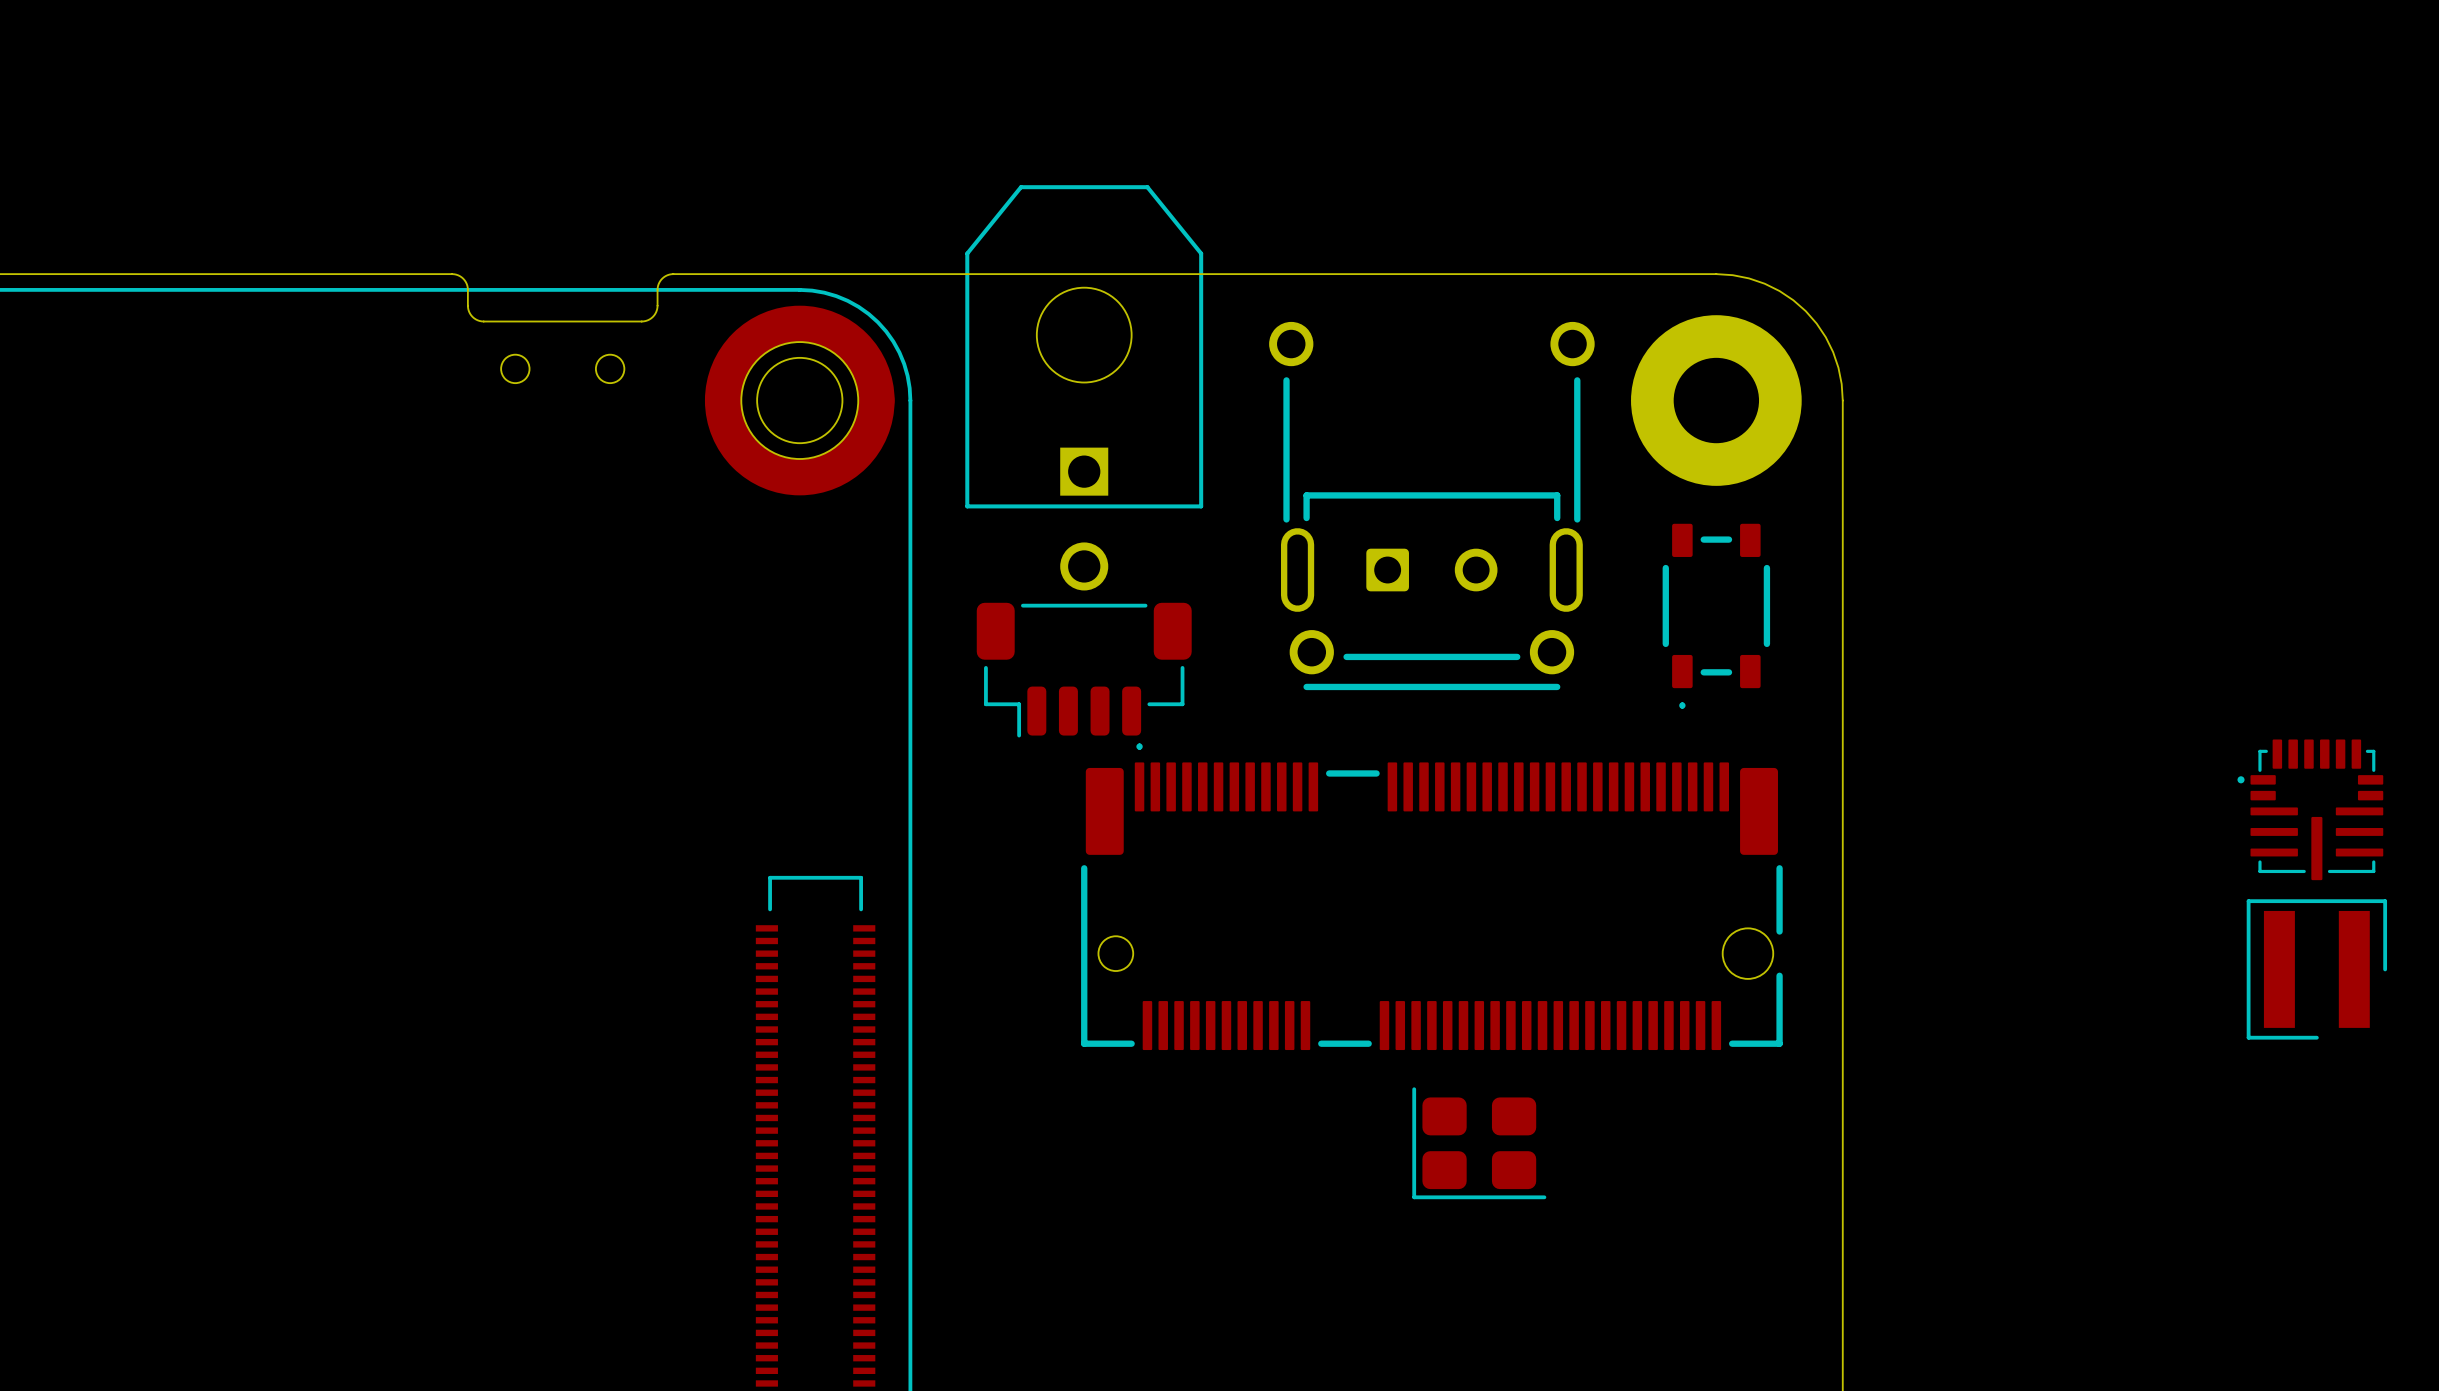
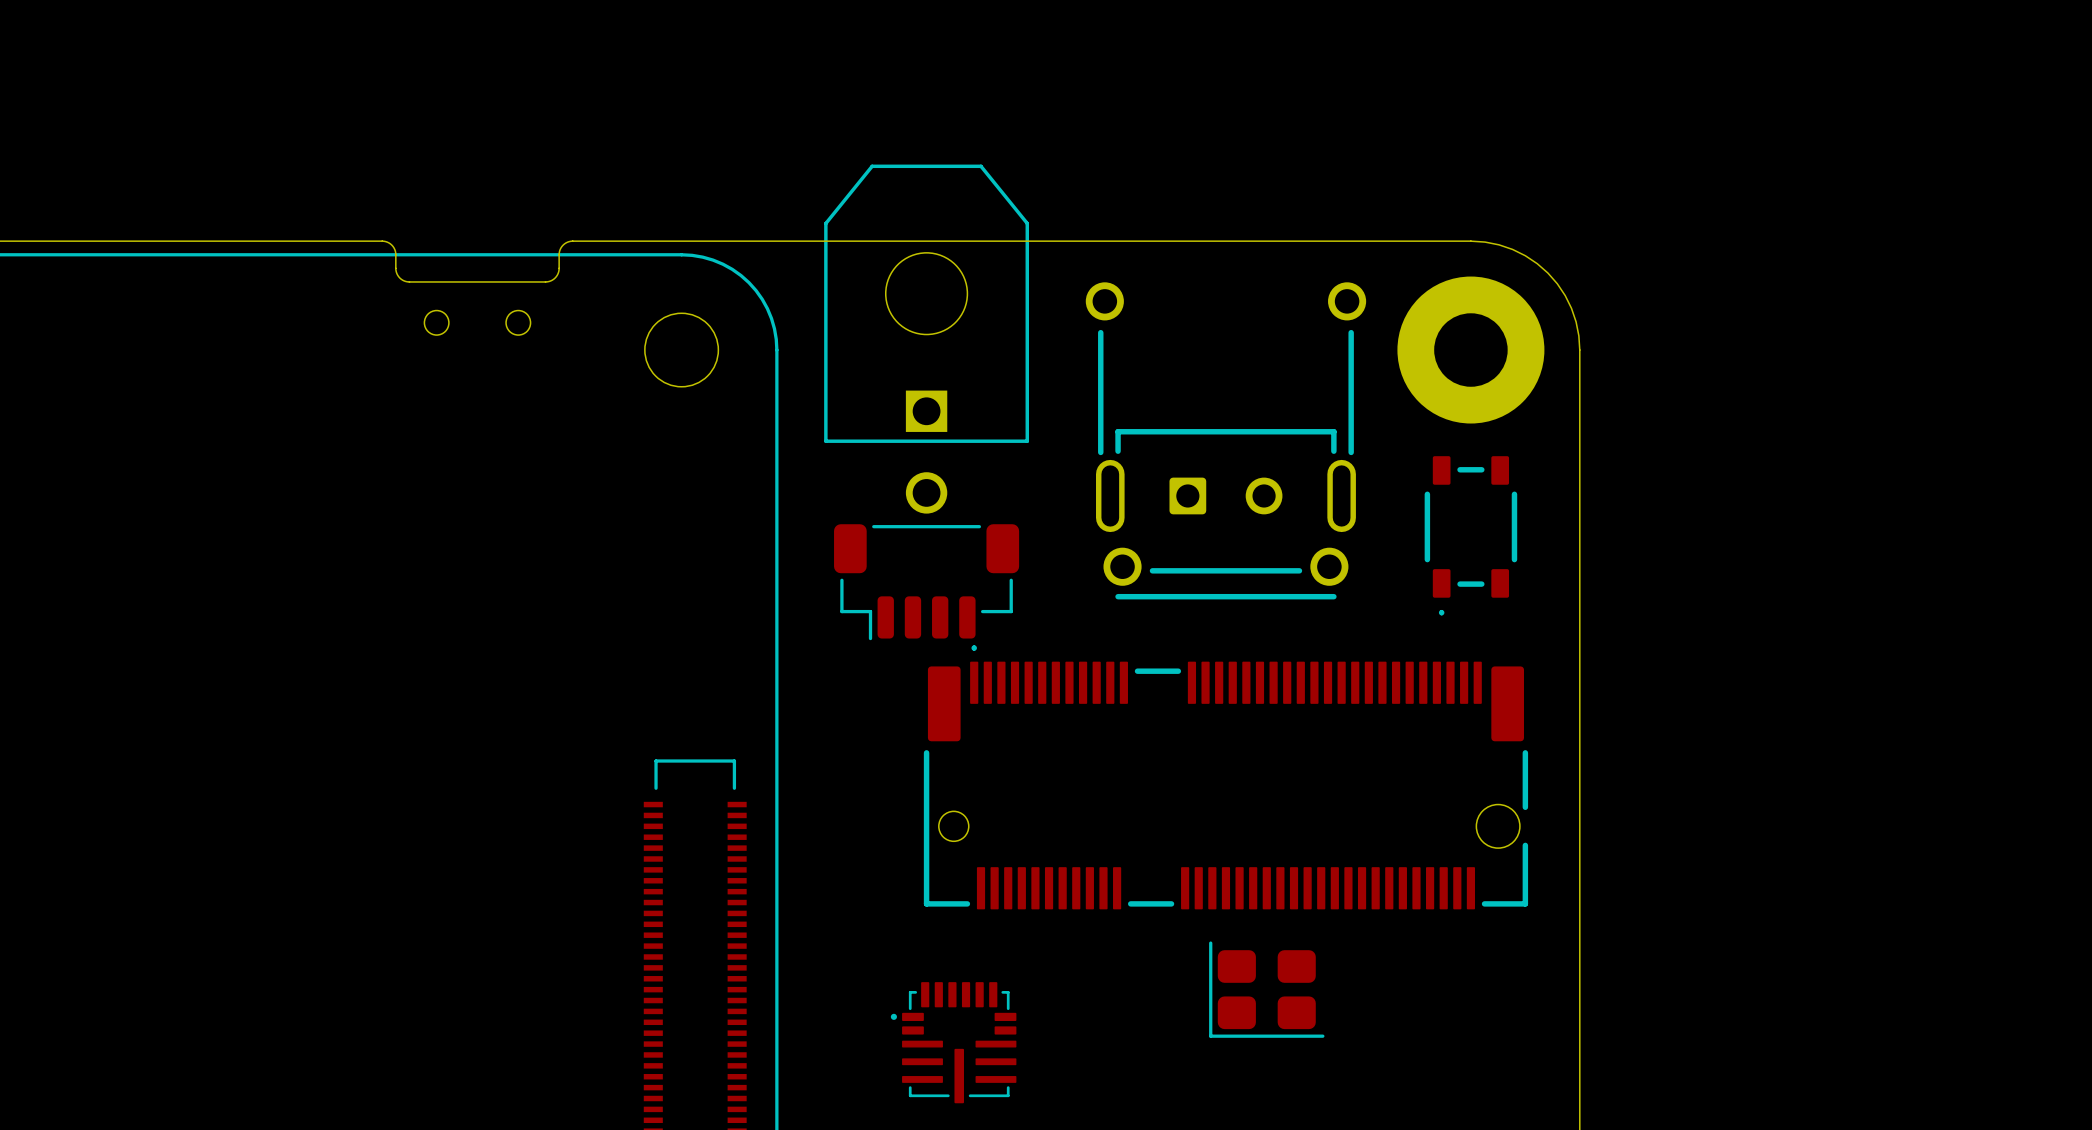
part: (799, 400) -> none
part: (2310, 809) -> none
part: (2316, 969) -> none
part: none -> (953, 1042)

